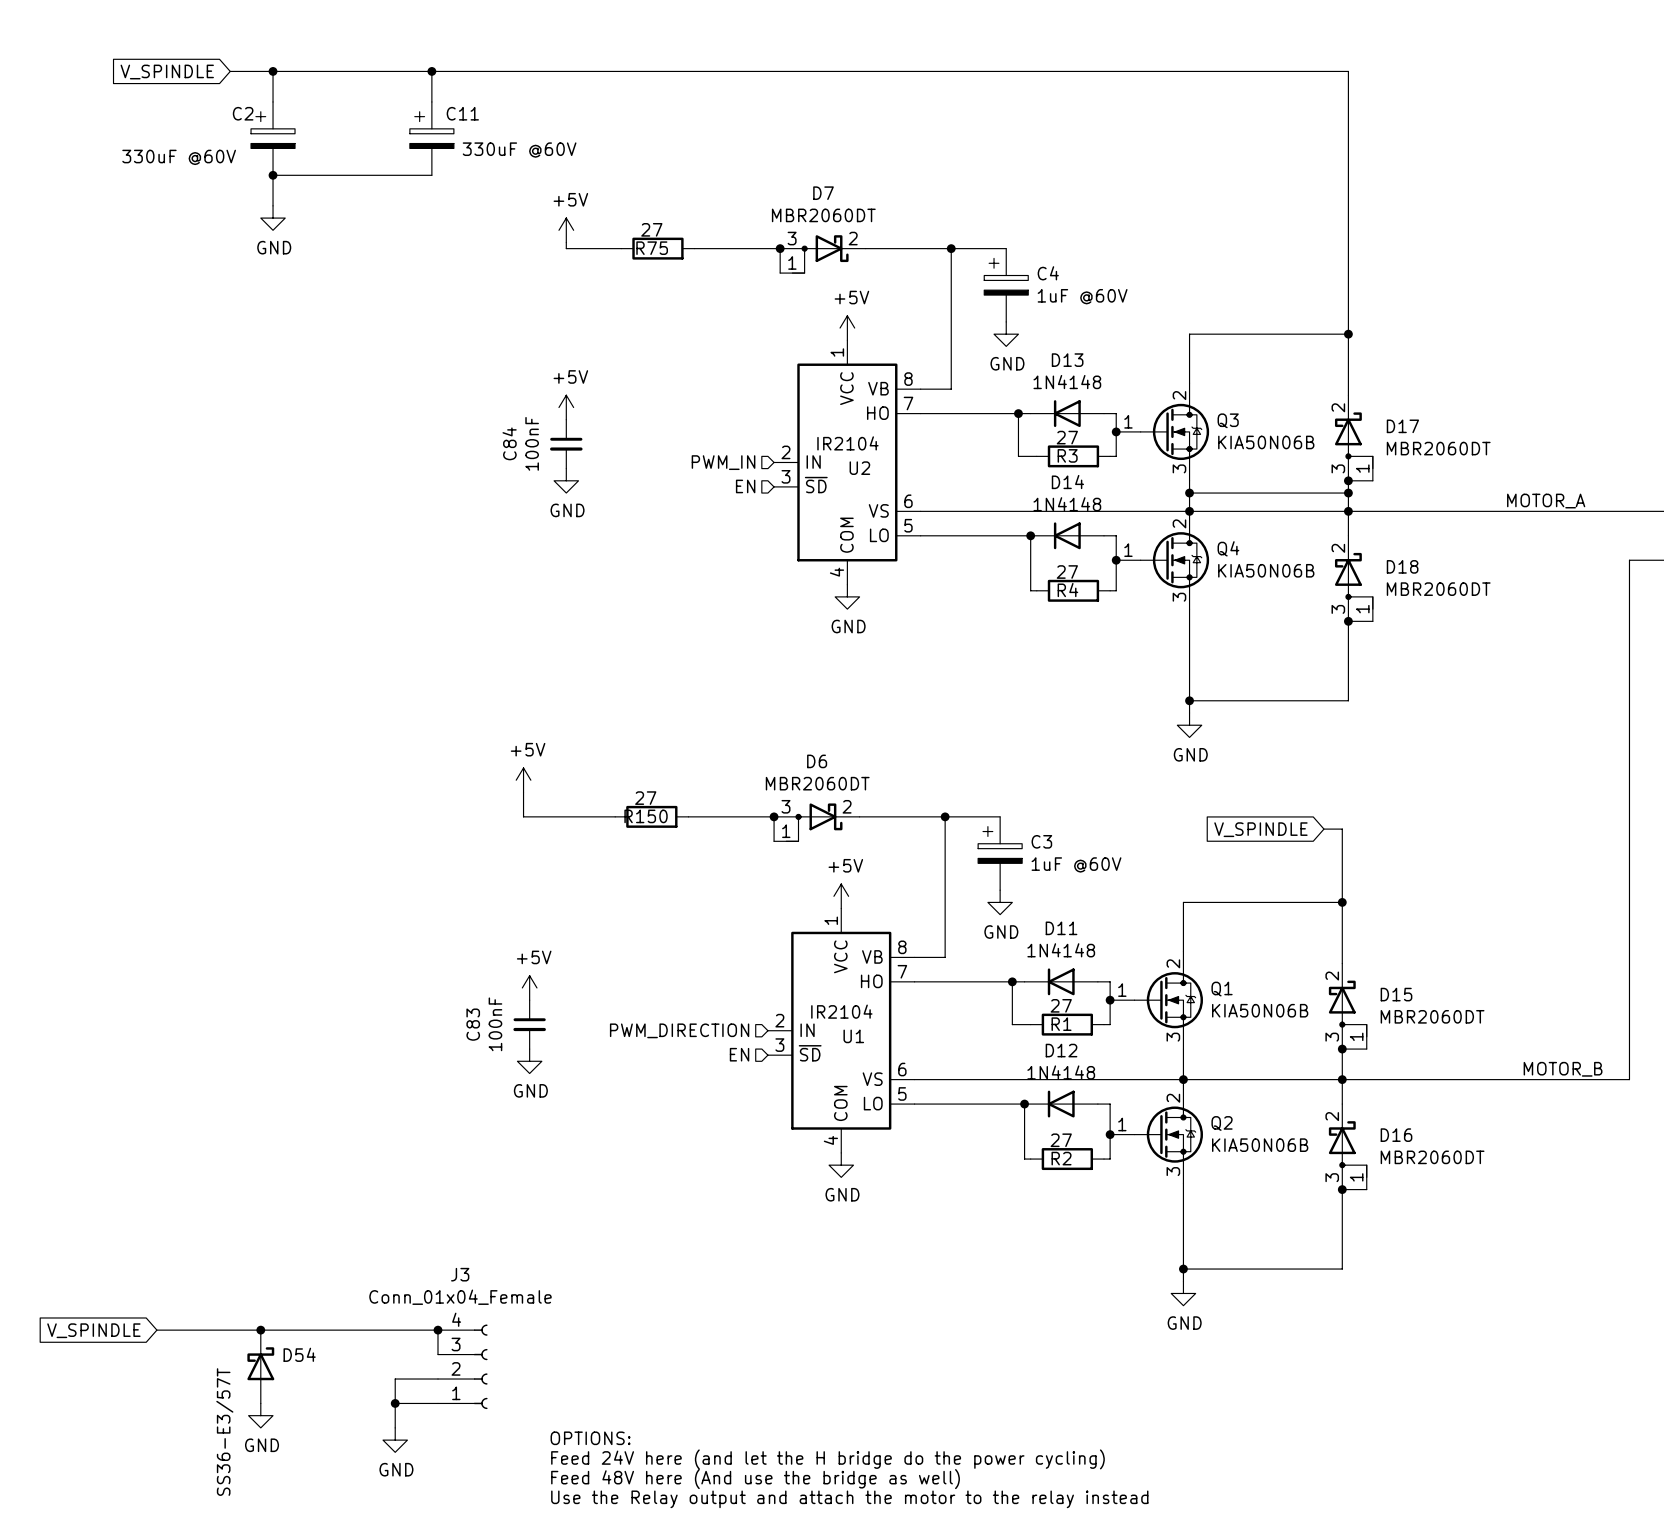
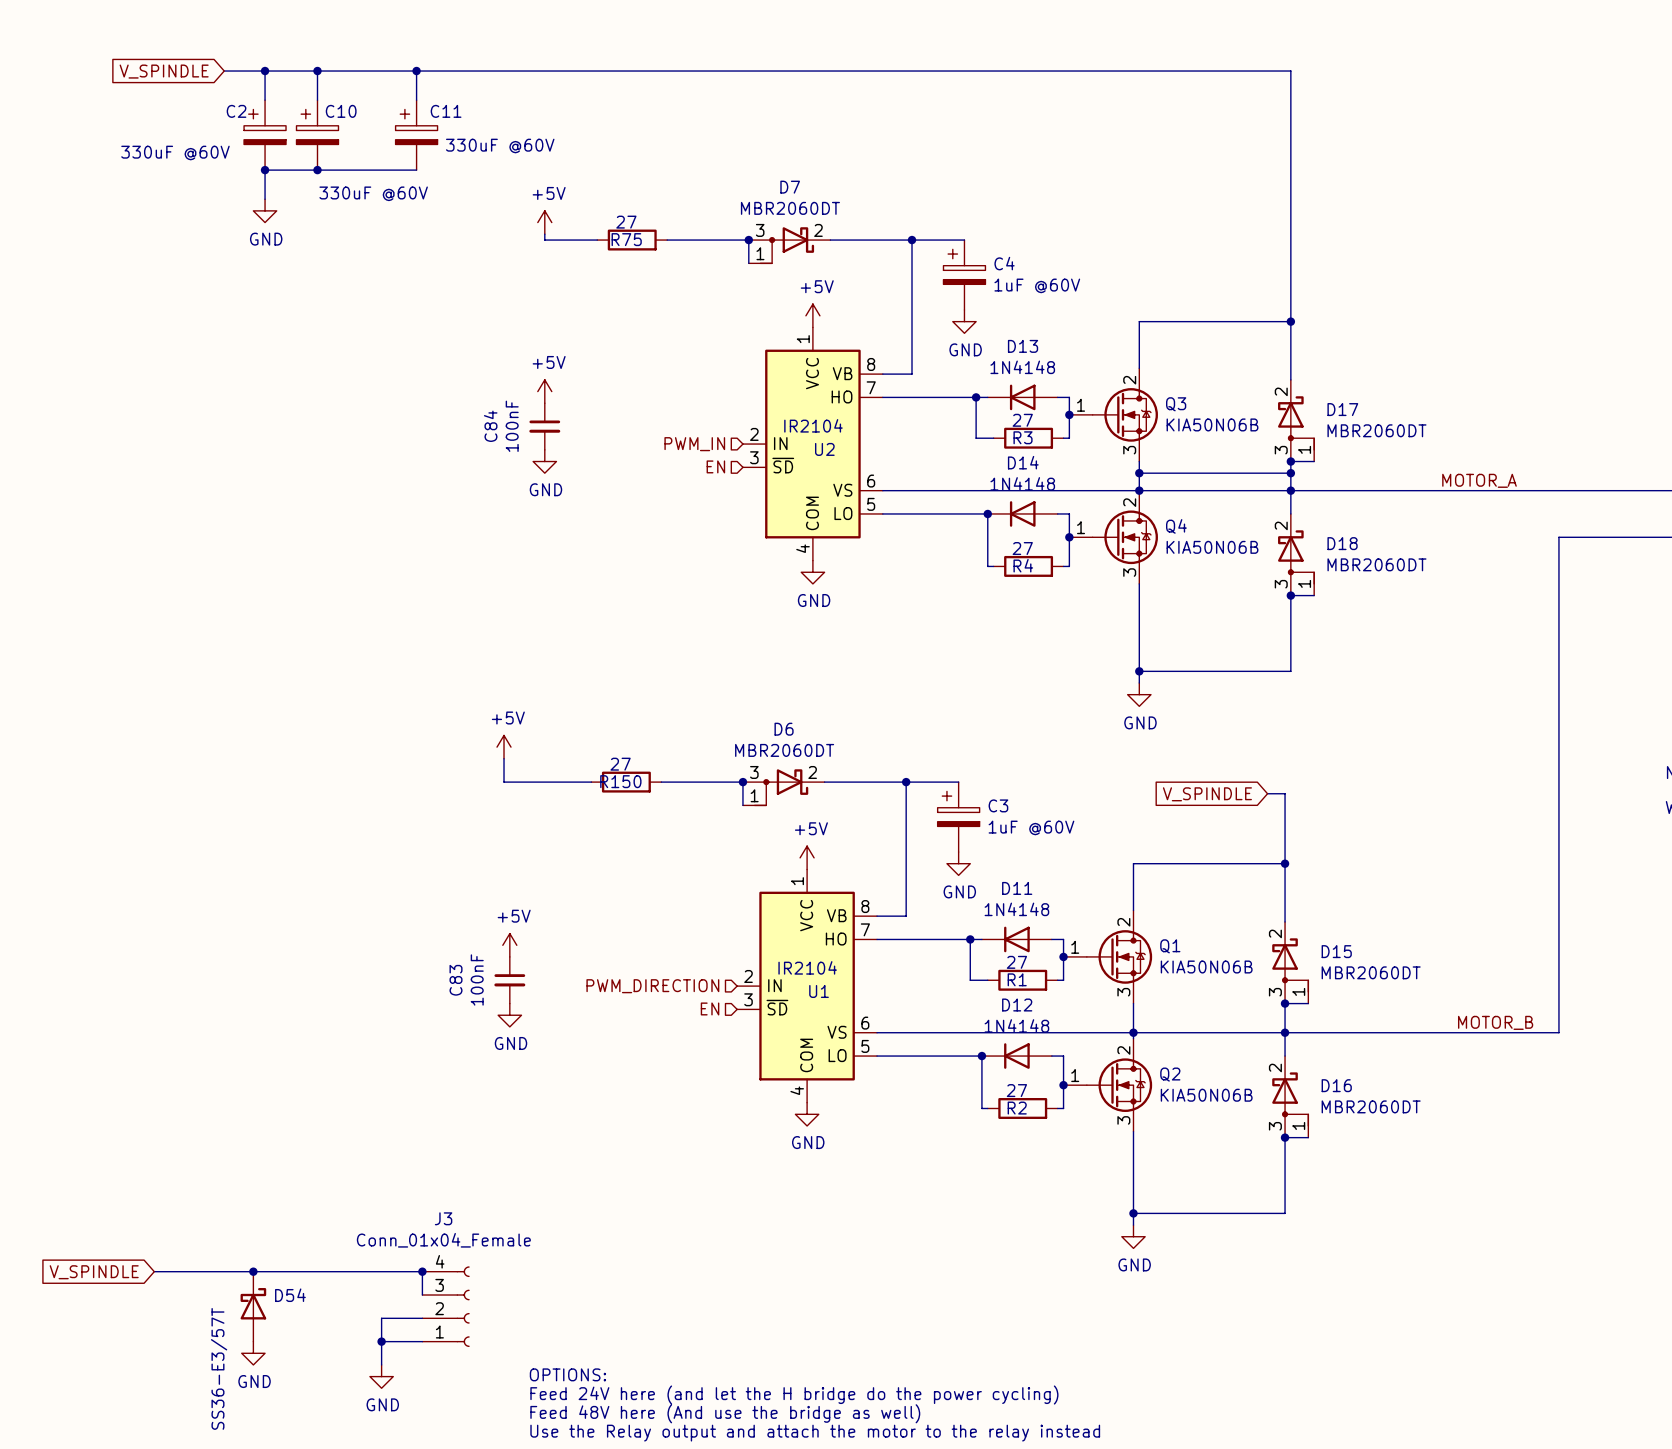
wire: none -> (317, 71) (317, 100)
junction: none -> (317, 71)
C10: none -> 330uF @60V (317, 135)
junction: none -> (317, 170)

